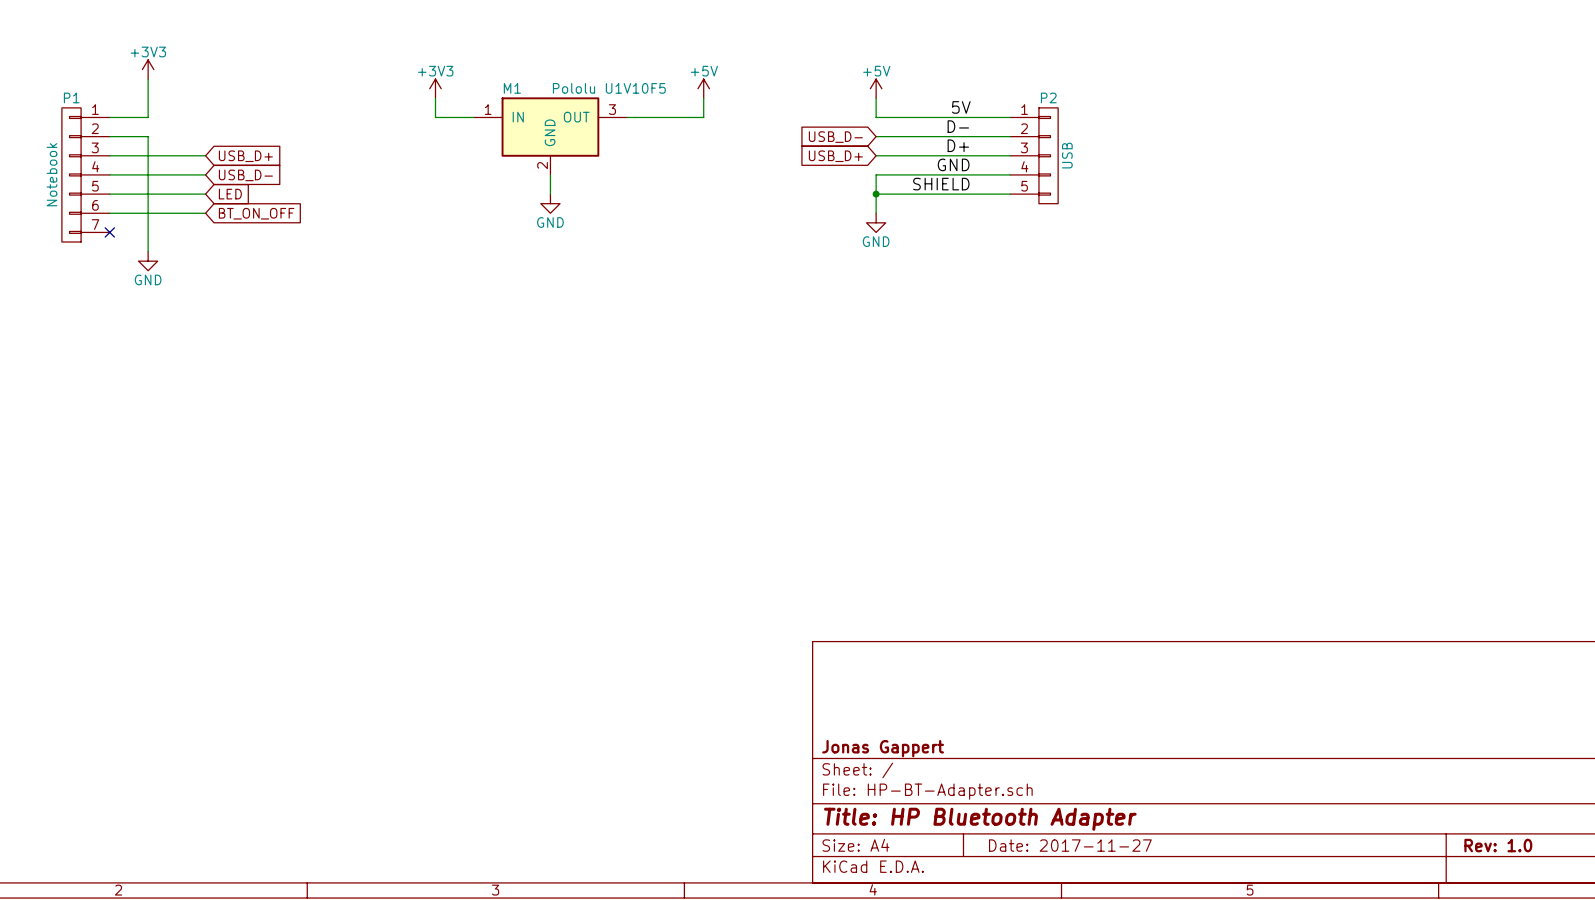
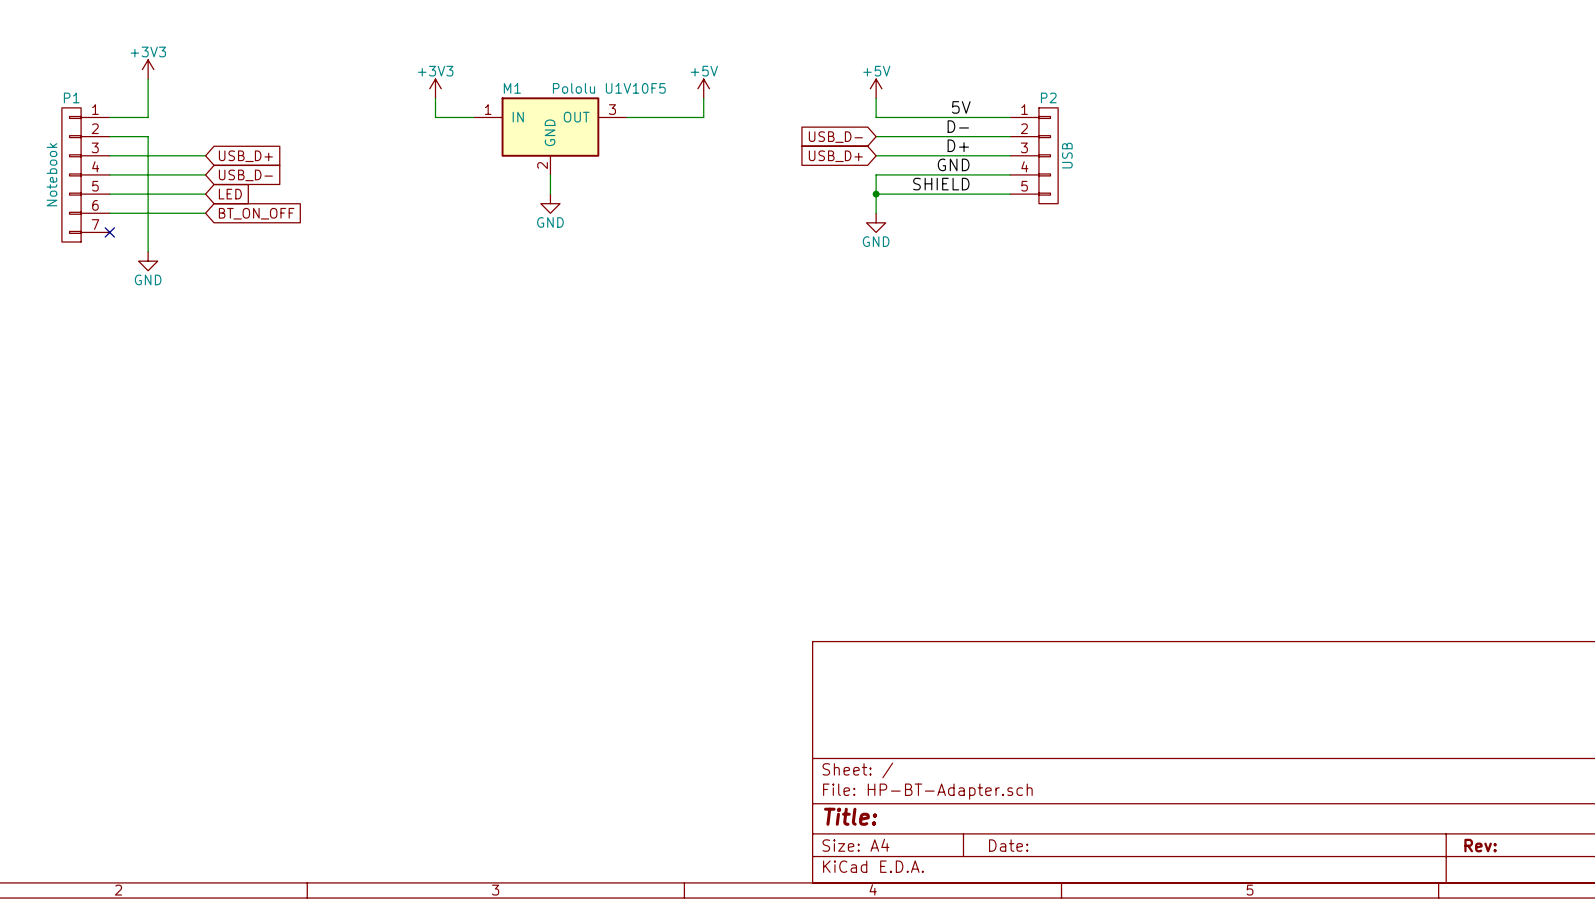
title block: Jonas Gappert (883, 748) -> none
title block: Title: HP Bluetooth Adapter (980, 819) -> Title: (850, 816)
title block: Date: 2017-11-27 (1070, 845) -> Date: (1008, 845)
title block: Rev: 1.0 (1498, 845) -> Rev: (1480, 845)

